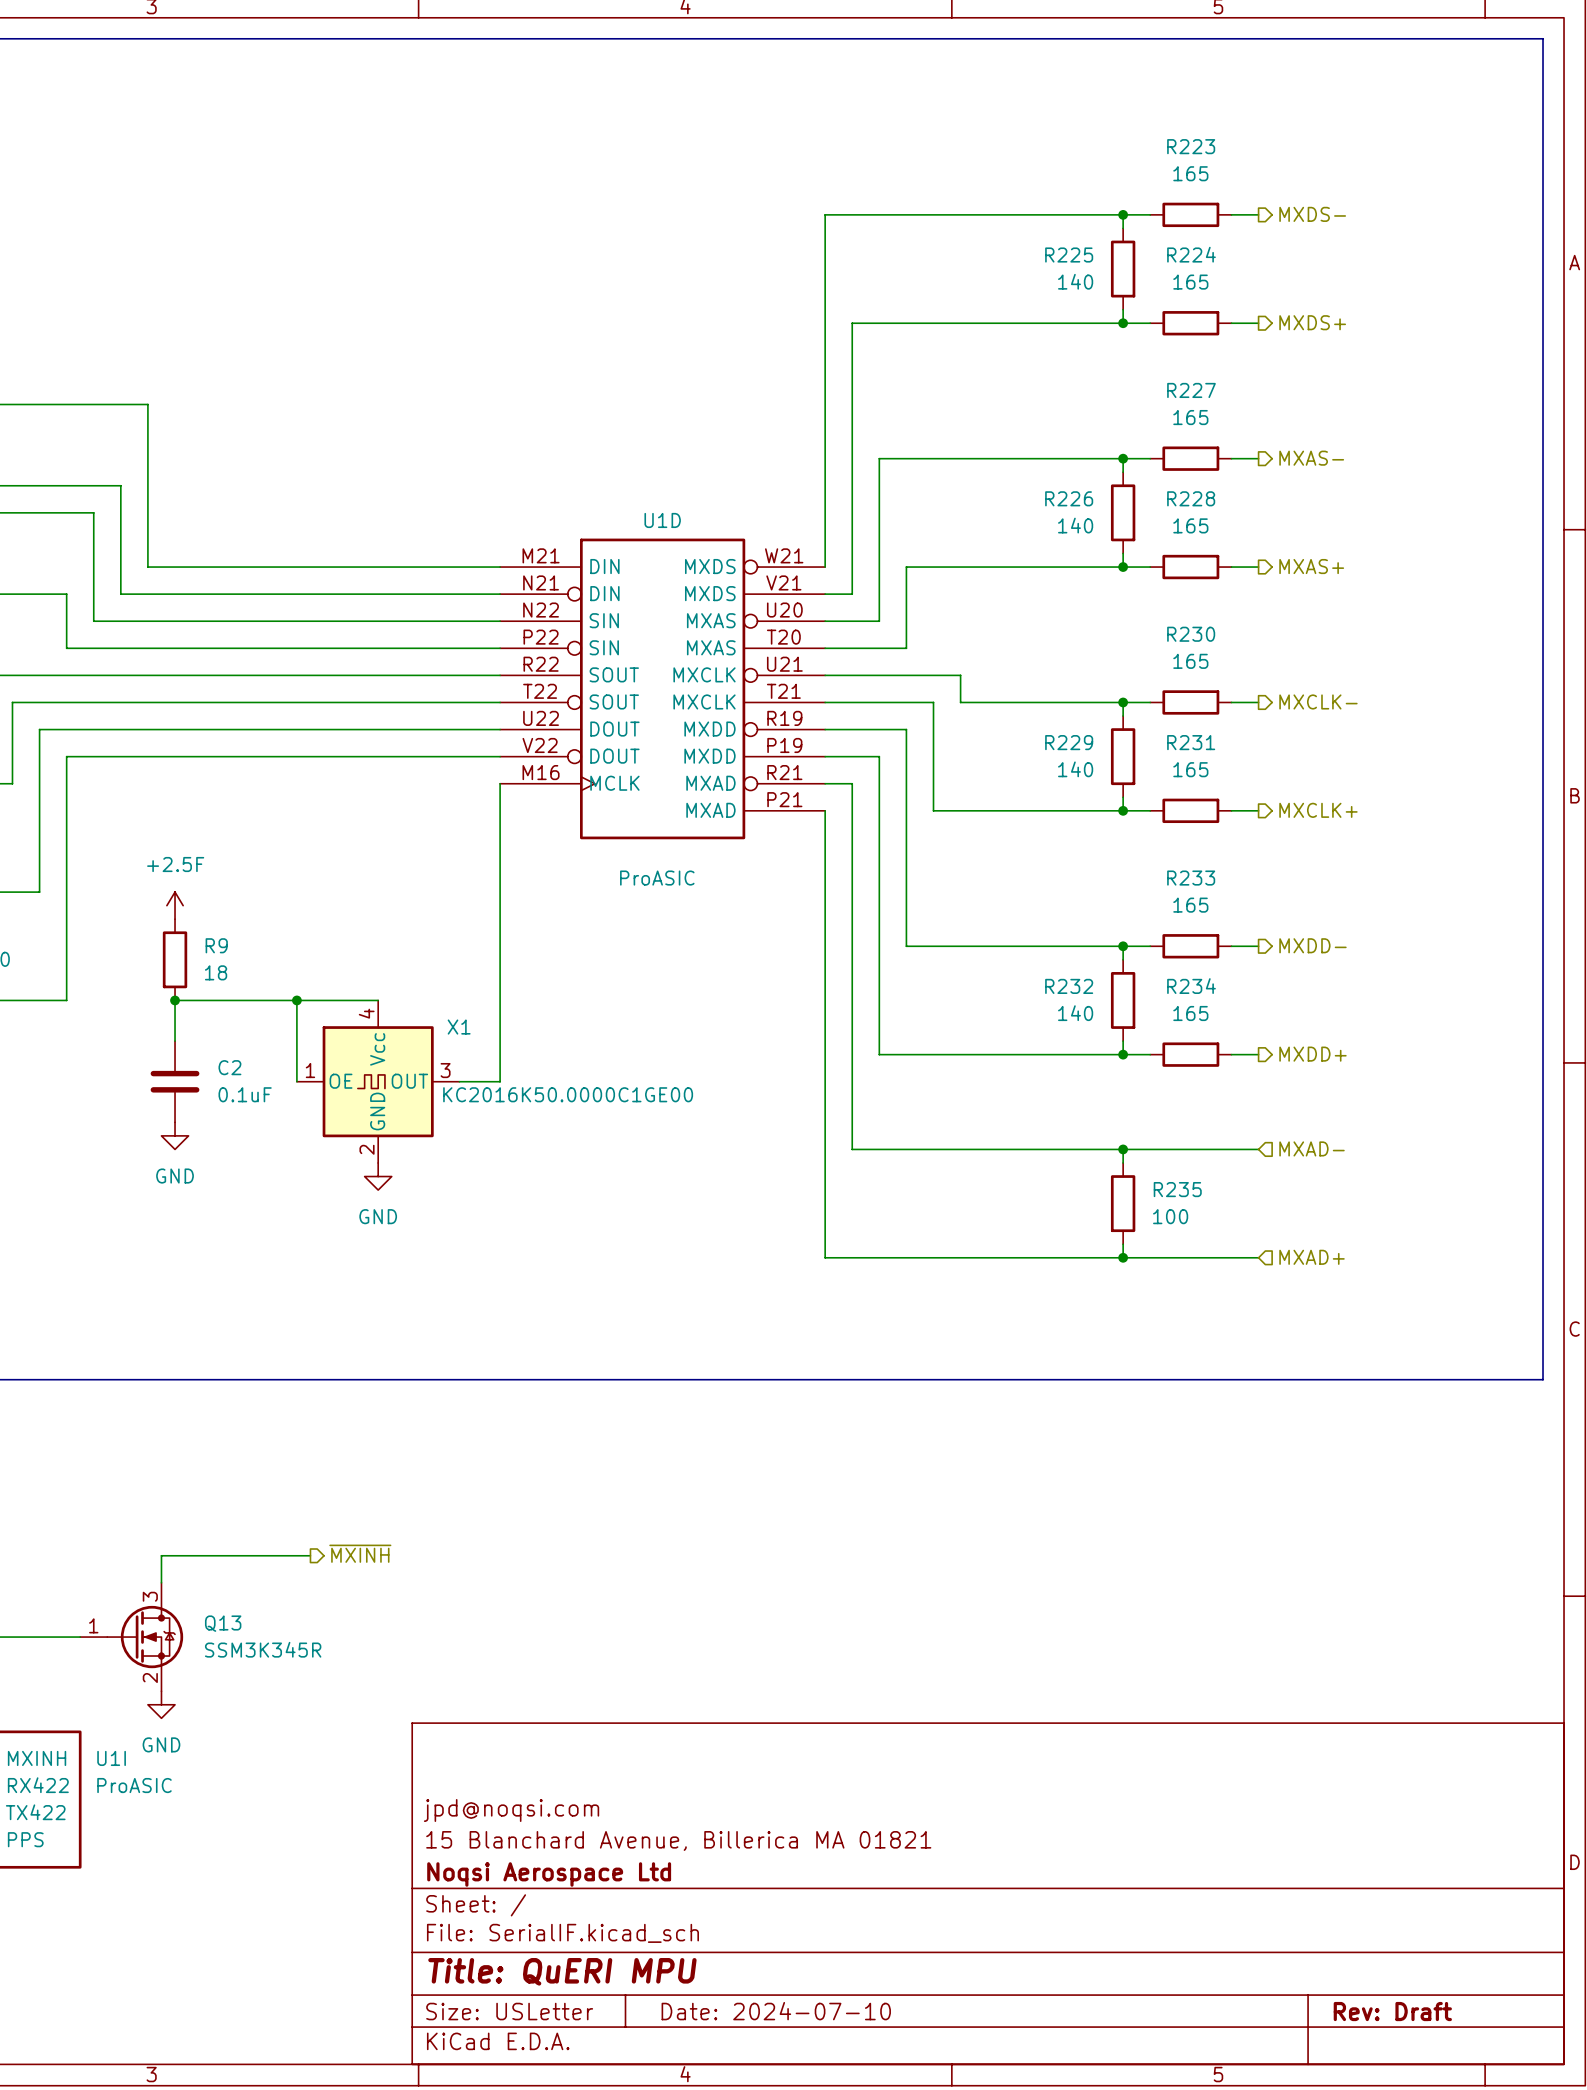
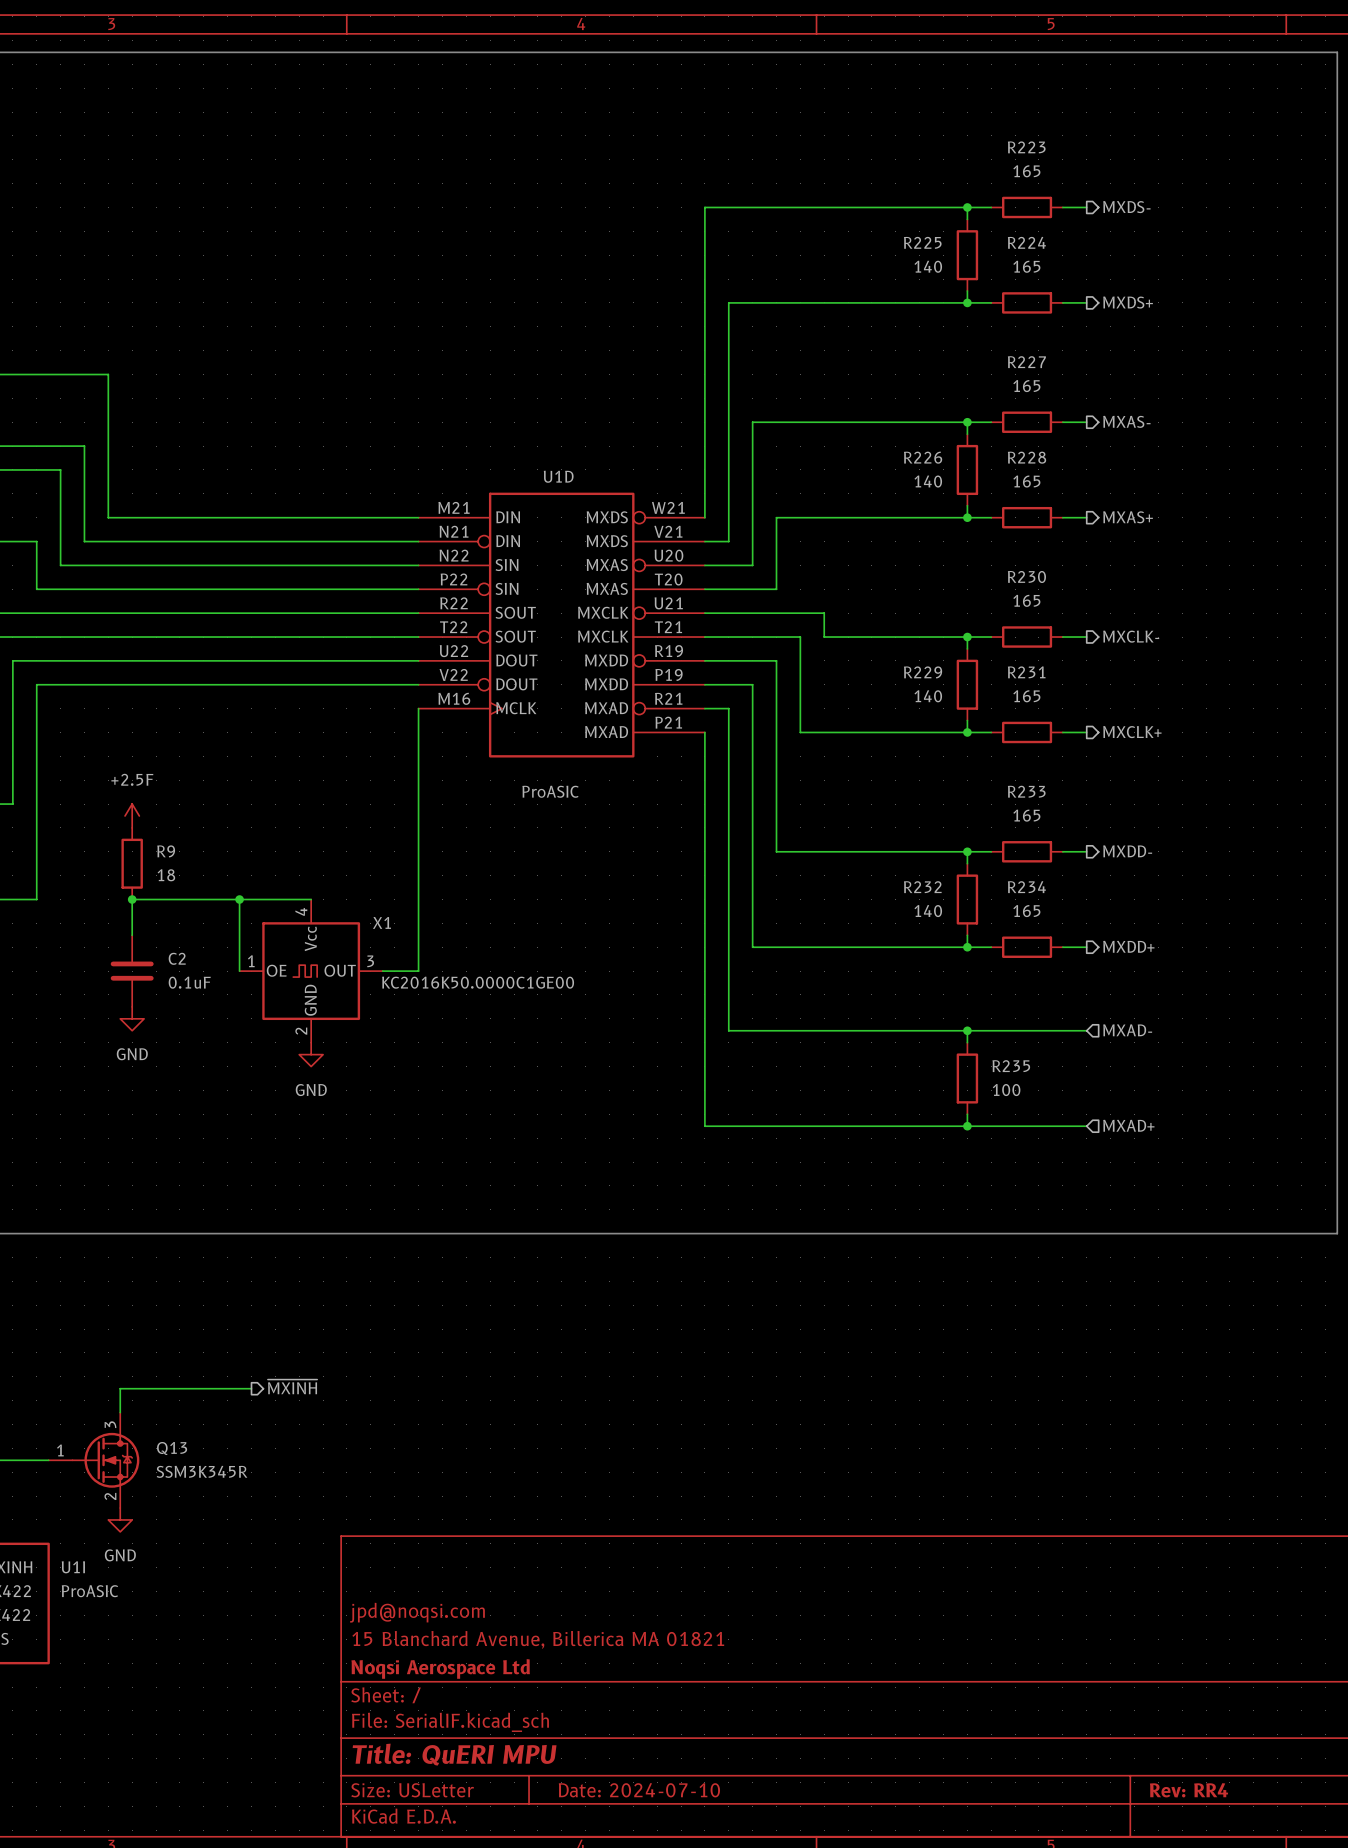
title block: Rev: Draft (1392, 2011) -> Rev: RR4 (1189, 1790)

